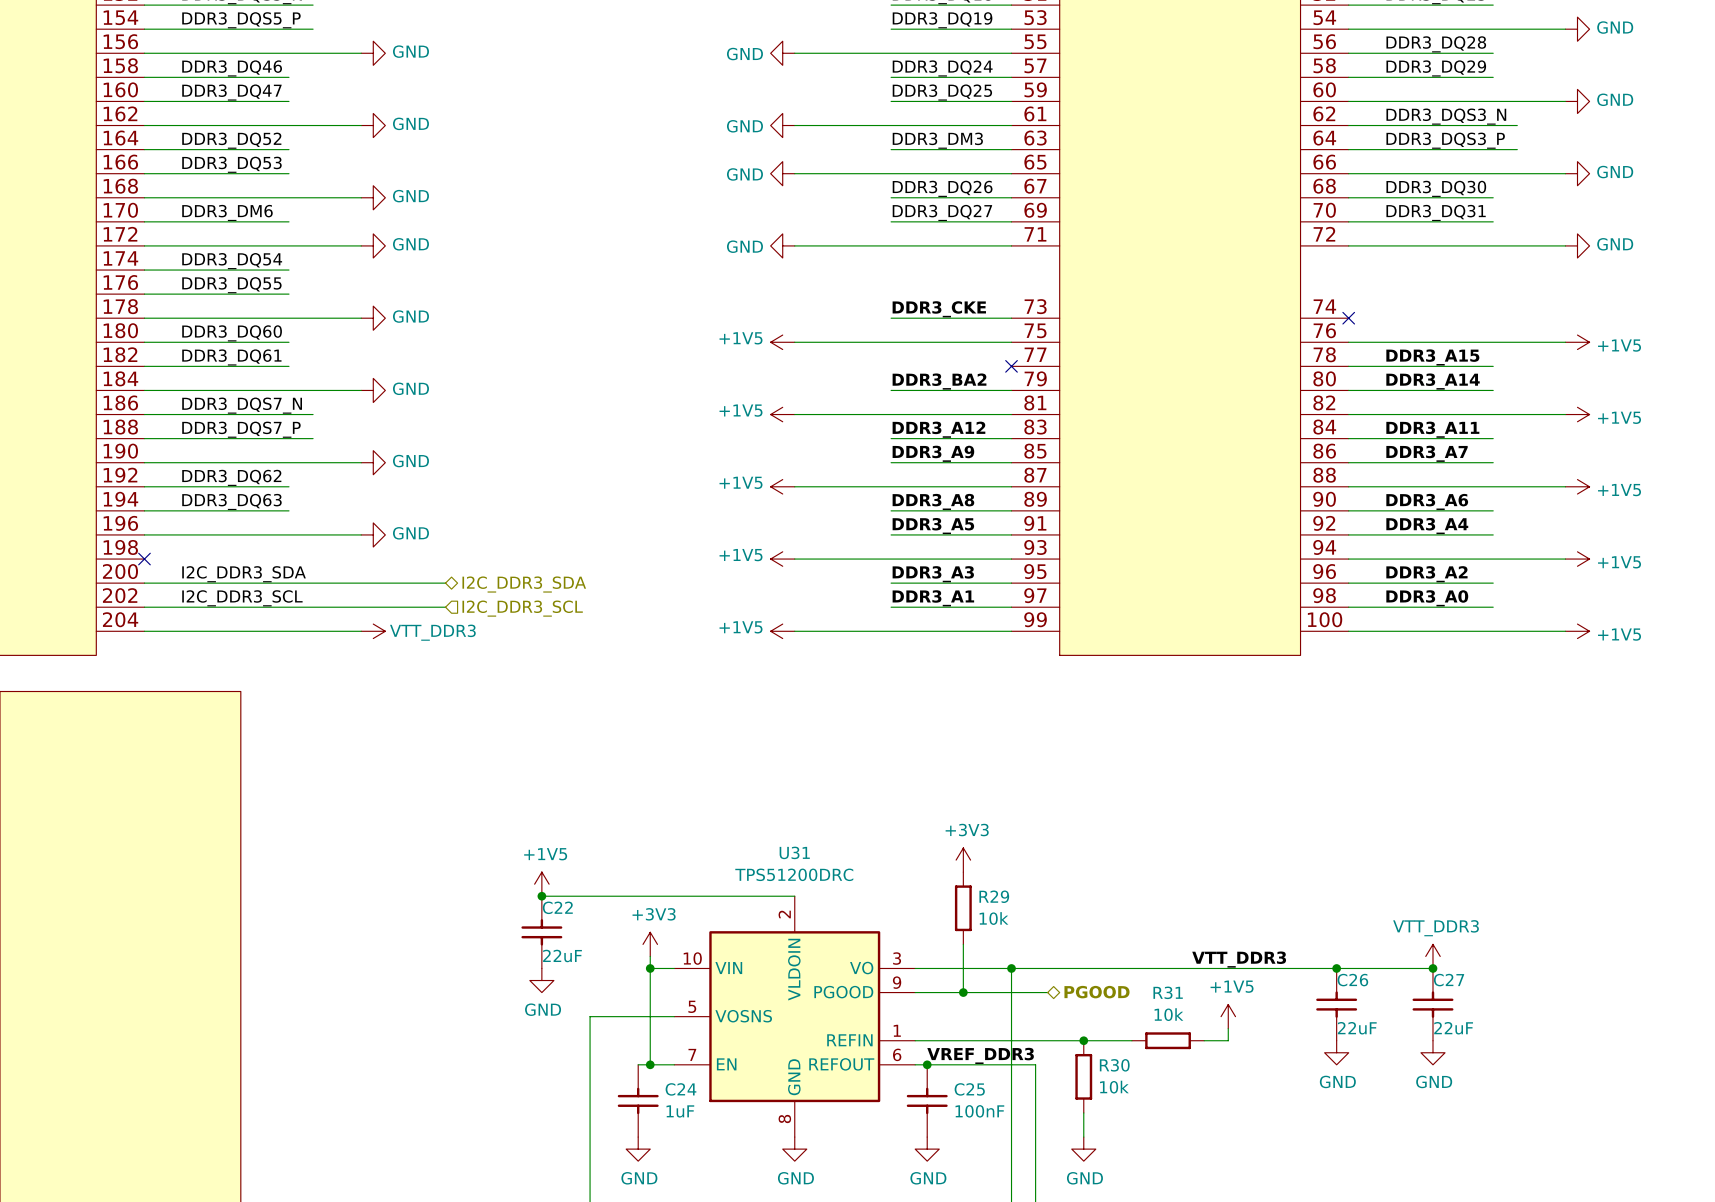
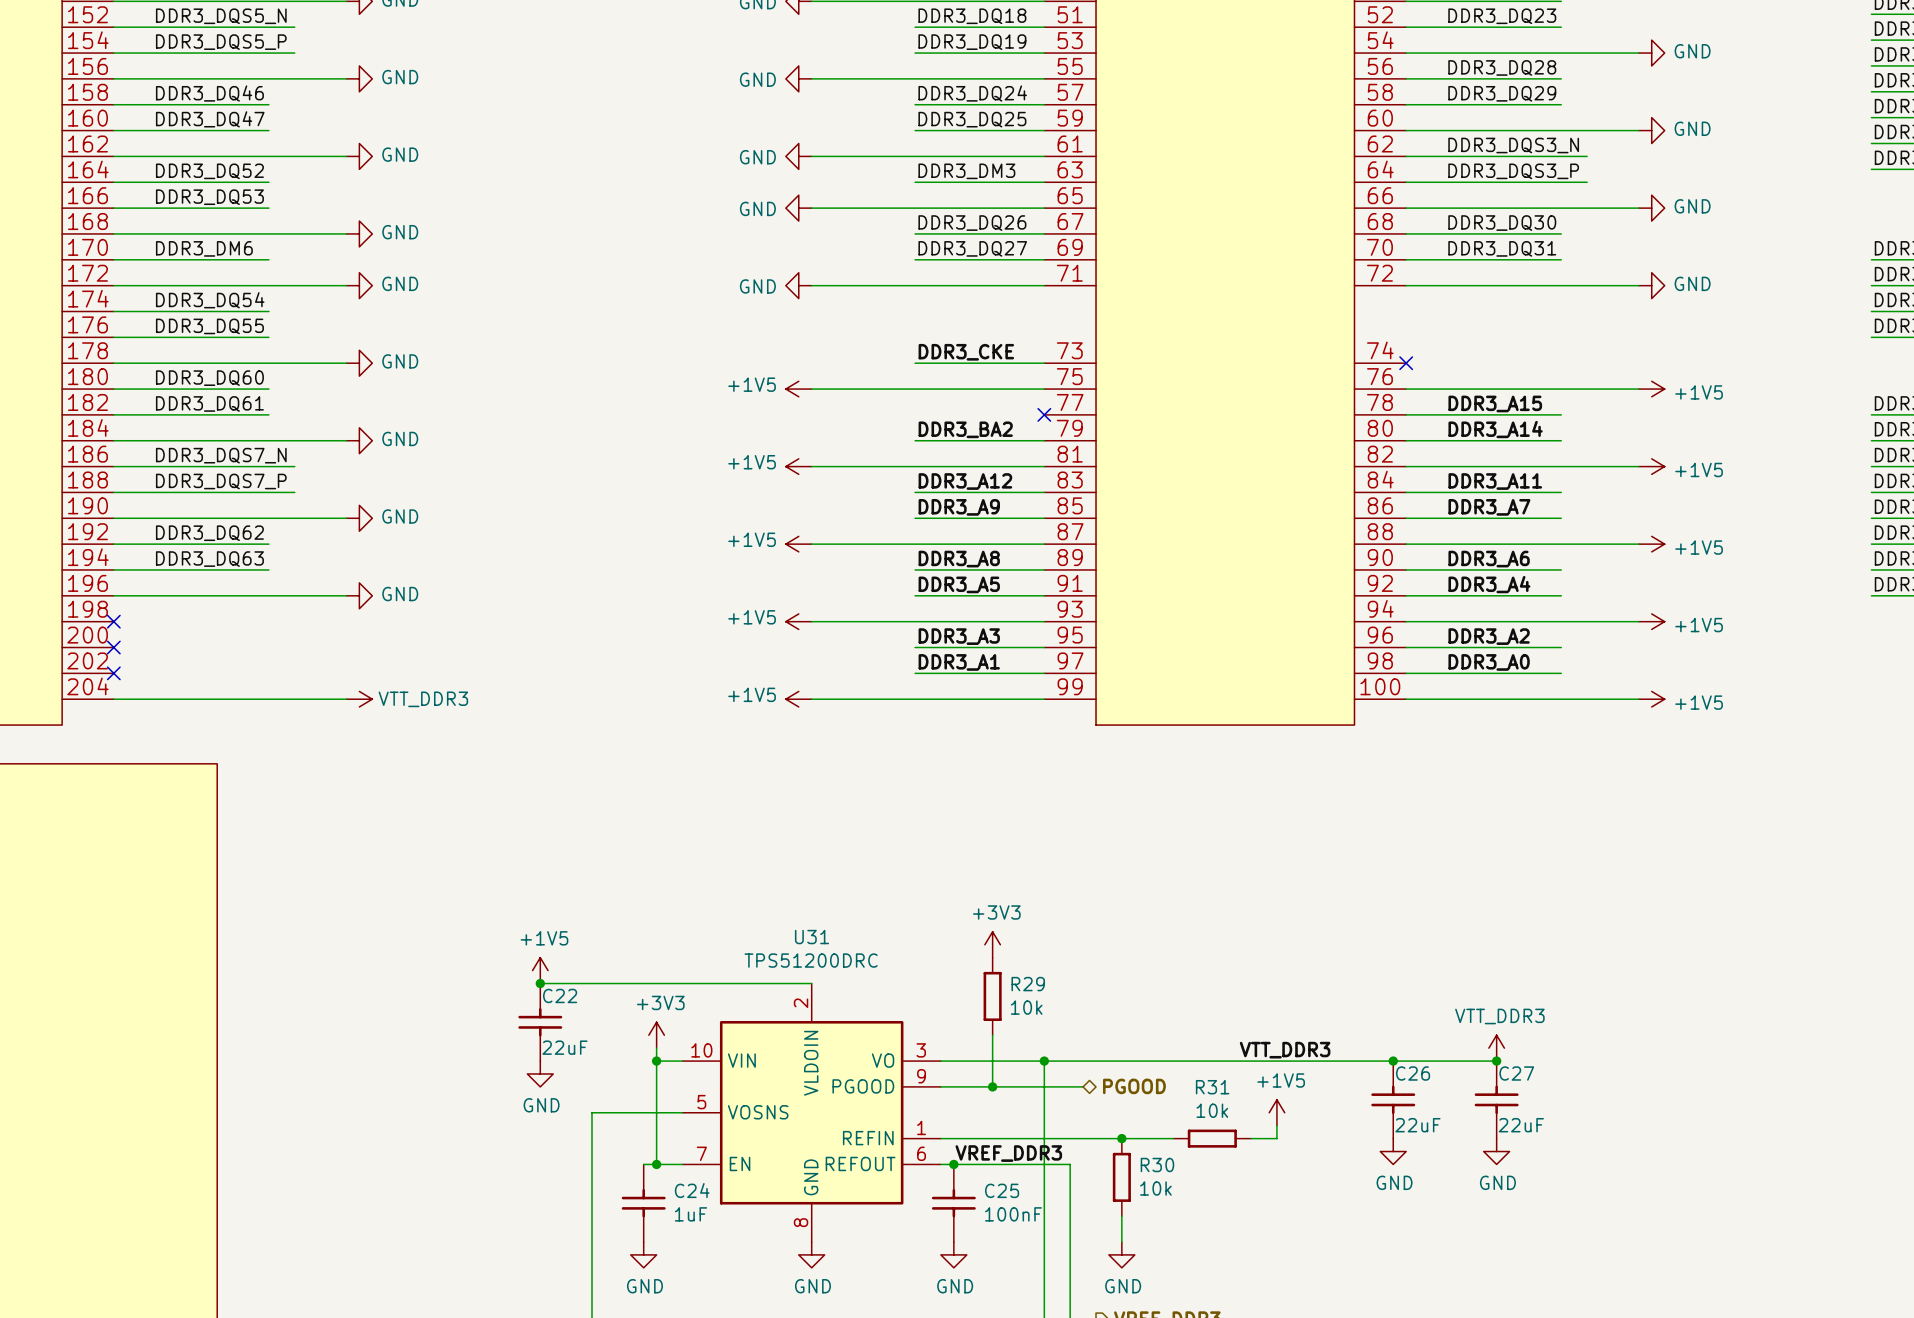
label: I2C_DDR3_SDA (244, 574) -> none
wire: (144, 583) (445, 583) -> none
no-connect mark: none -> (113, 647)
hierarchical label: I2C_DDR3_SDA (524, 584) -> none
label: I2C_DDR3_SCL (242, 598) -> none
wire: (144, 607) (445, 607) -> none
no-connect mark: none -> (113, 673)
hierarchical label: I2C_DDR3_SCL (522, 608) -> none

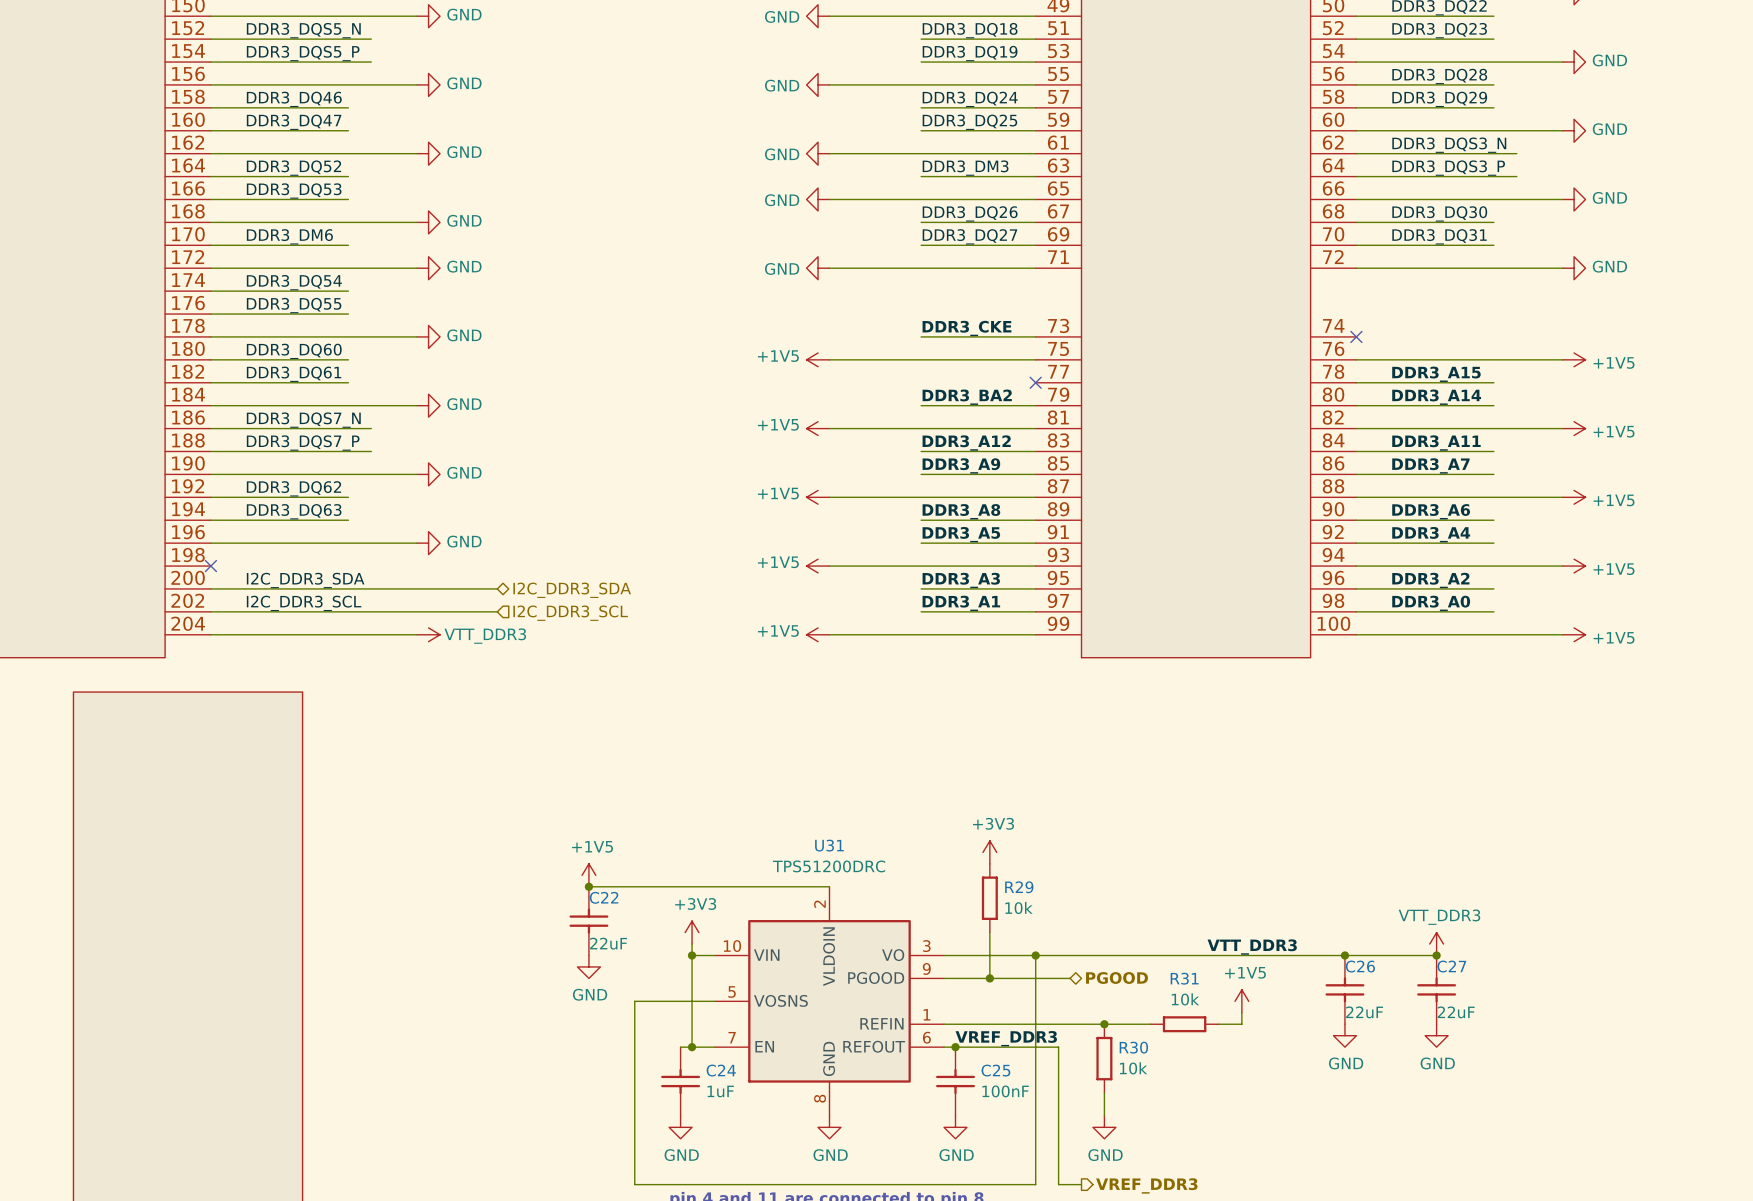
label: none -> I2C_DDR3_SDA (305, 580)
wire: none -> (210, 588) (497, 588)
no-connect mark: (113, 647) -> none
hierarchical label: none -> I2C_DDR3_SDA (572, 590)
label: none -> I2C_DDR3_SCL (304, 603)
wire: none -> (210, 611) (497, 611)
no-connect mark: (113, 673) -> none
hierarchical label: none -> I2C_DDR3_SCL (570, 613)

